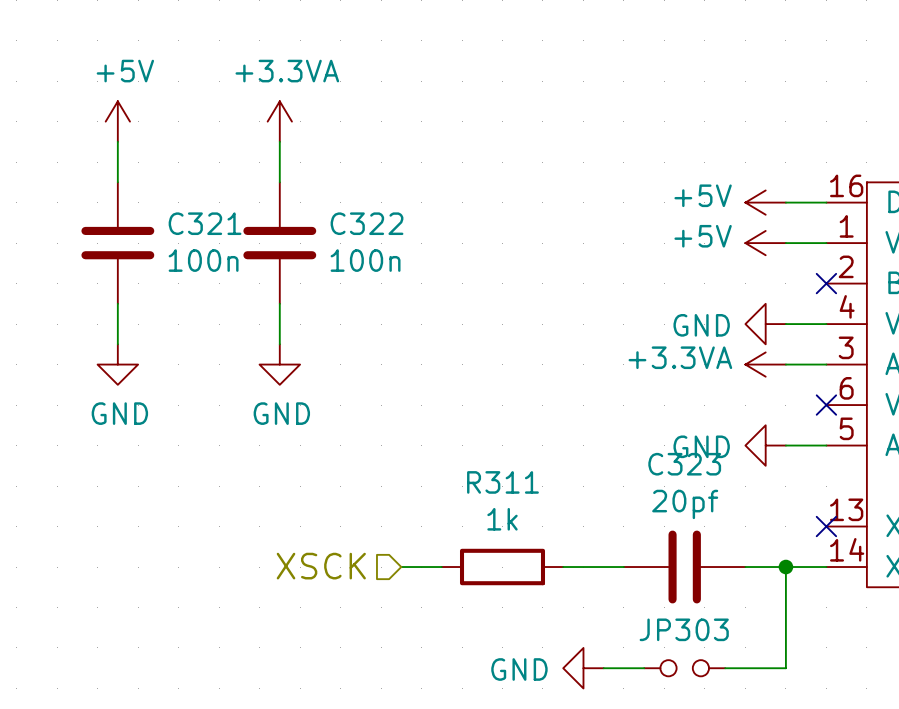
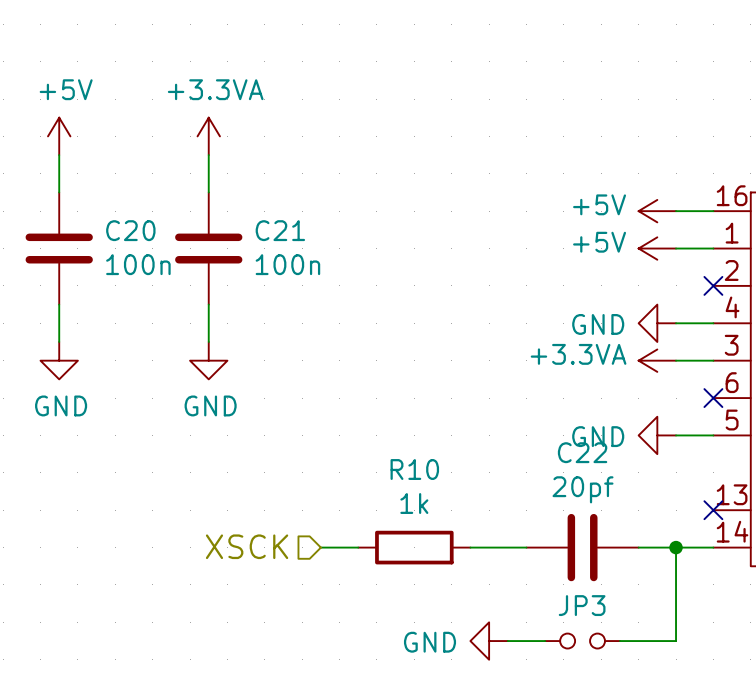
C321 name: C321 (205, 223) -> C20 (130, 230)
C322 name: C322 (367, 223) -> C21 (280, 230)
C323 name: C323 (684, 464) -> C22 (582, 452)
R311 name: R311 (502, 482) -> R10 (414, 469)
JP303 name: JP303 (684, 629) -> JP3 (582, 605)

